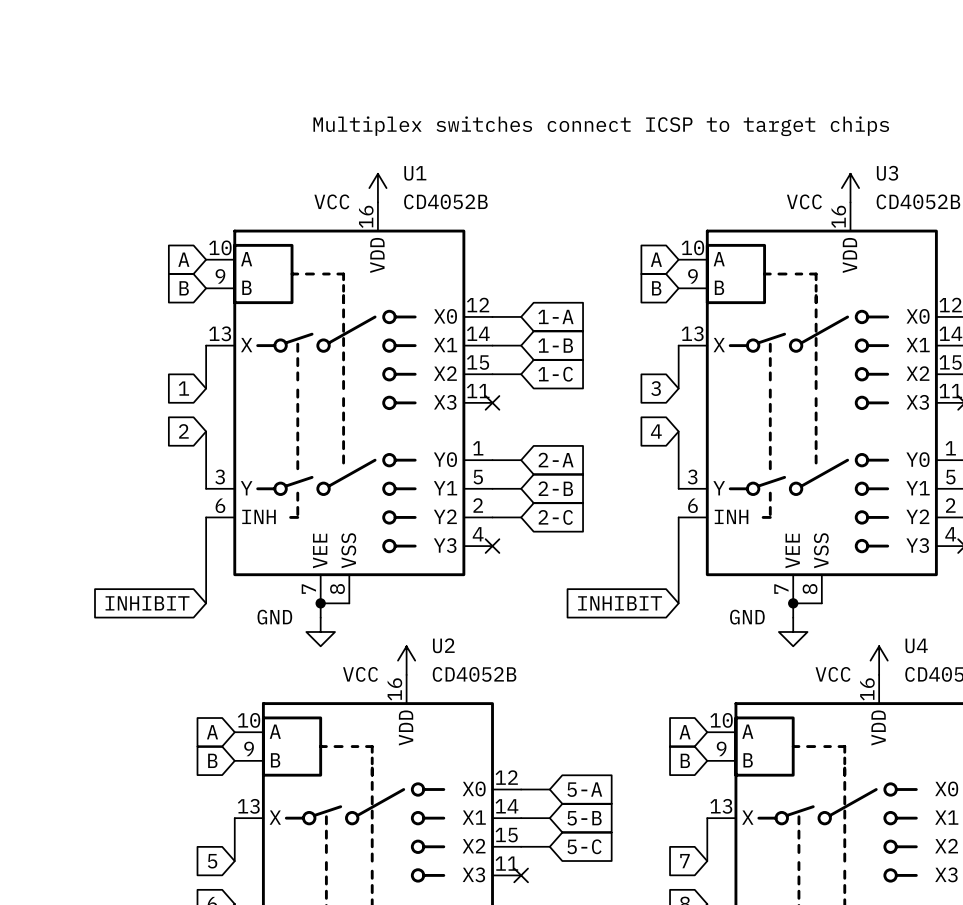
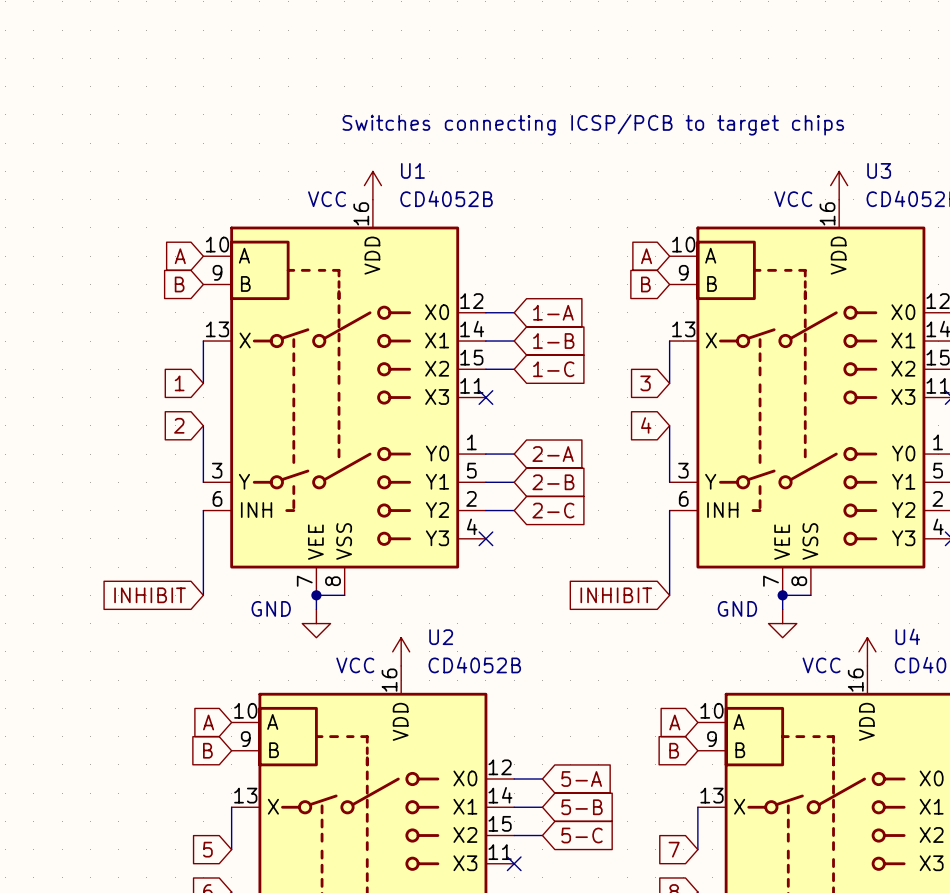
text: Multiplex switches connect ICSP to target chips (601, 126) -> Switches connecting ICSP/PCB to target chips (593, 124)

